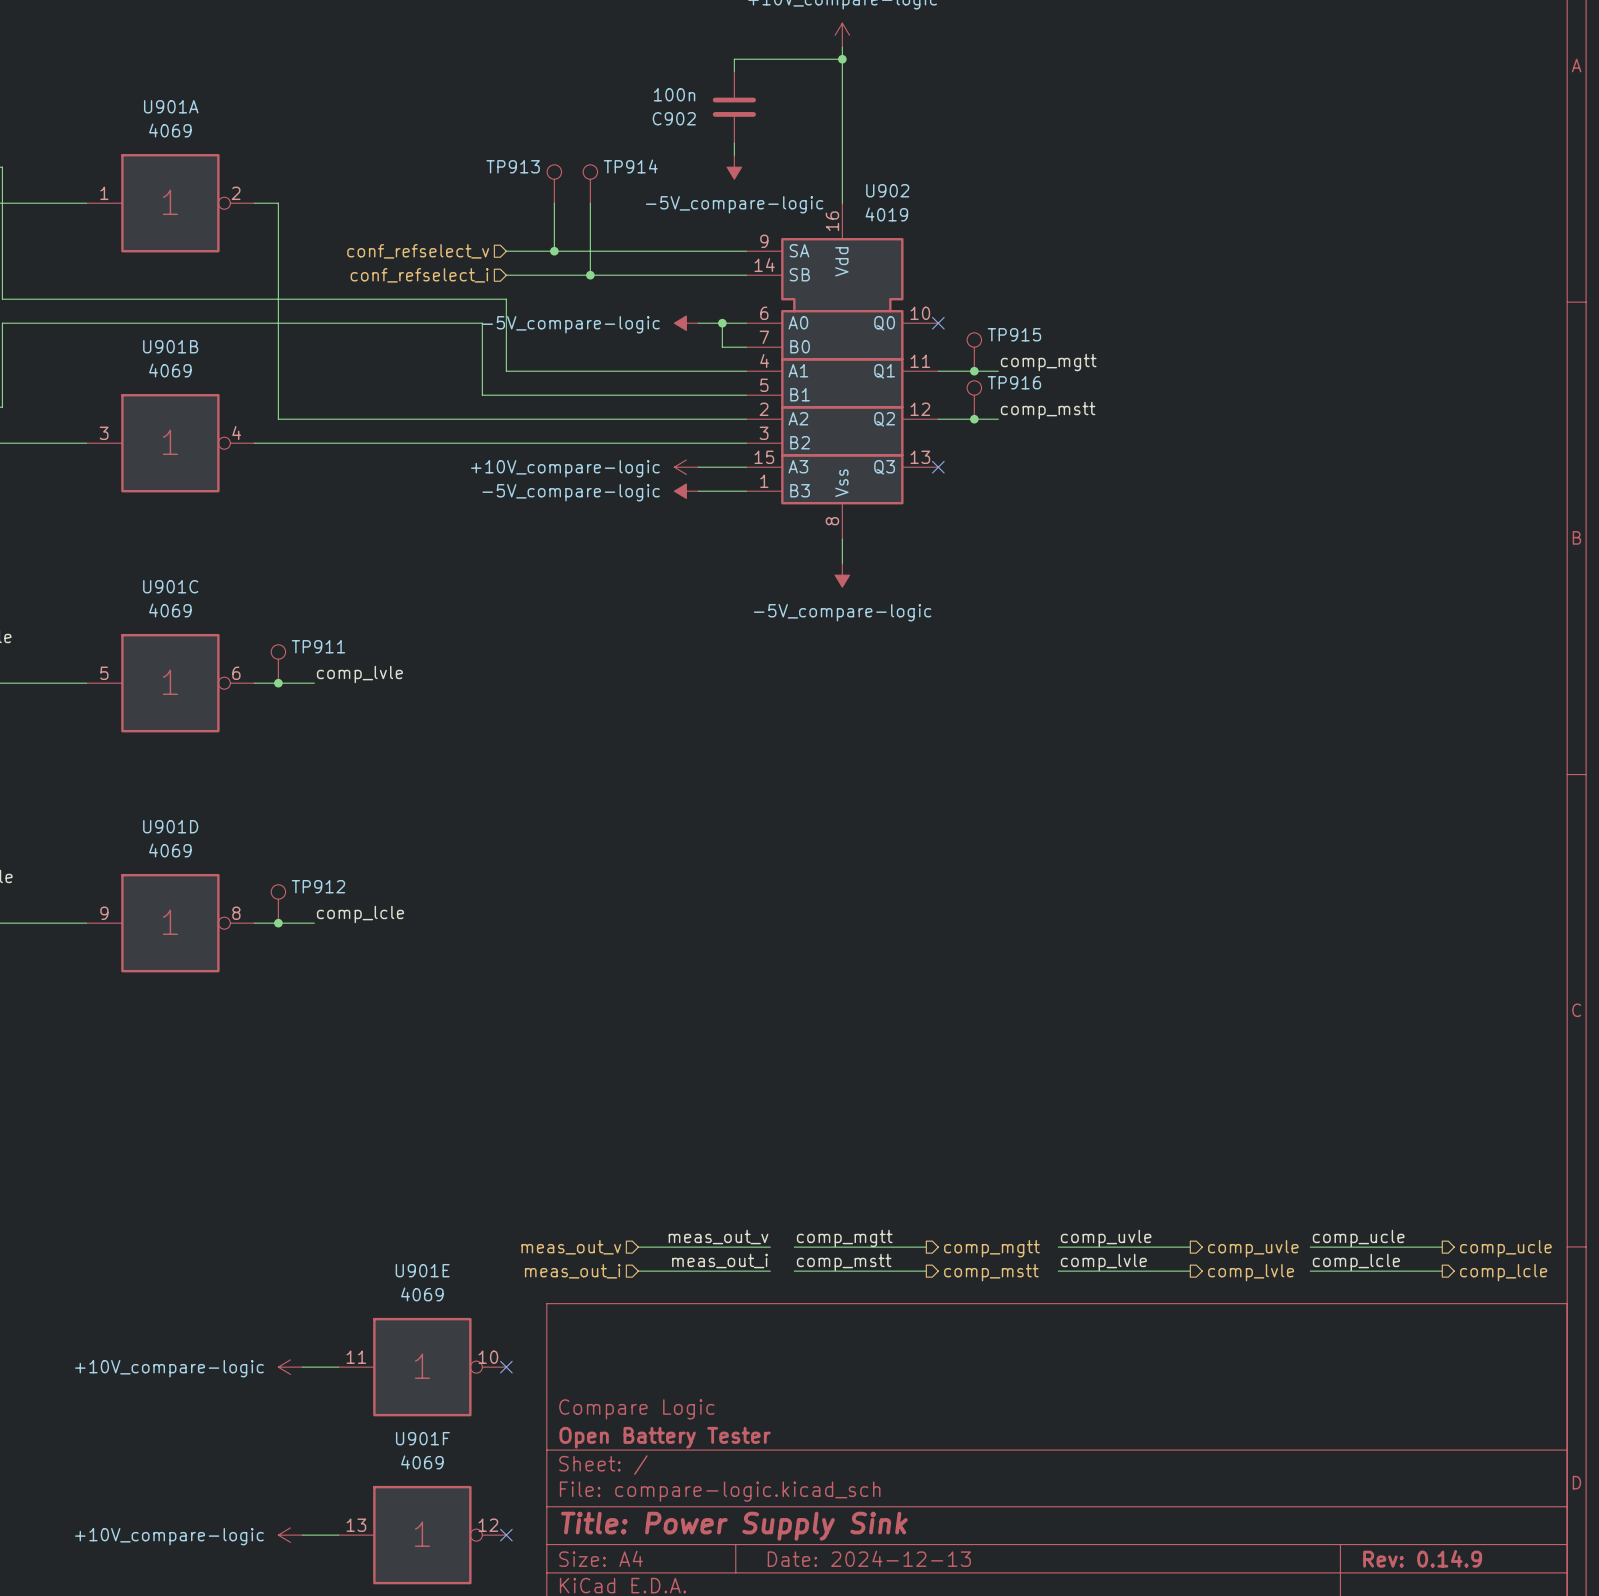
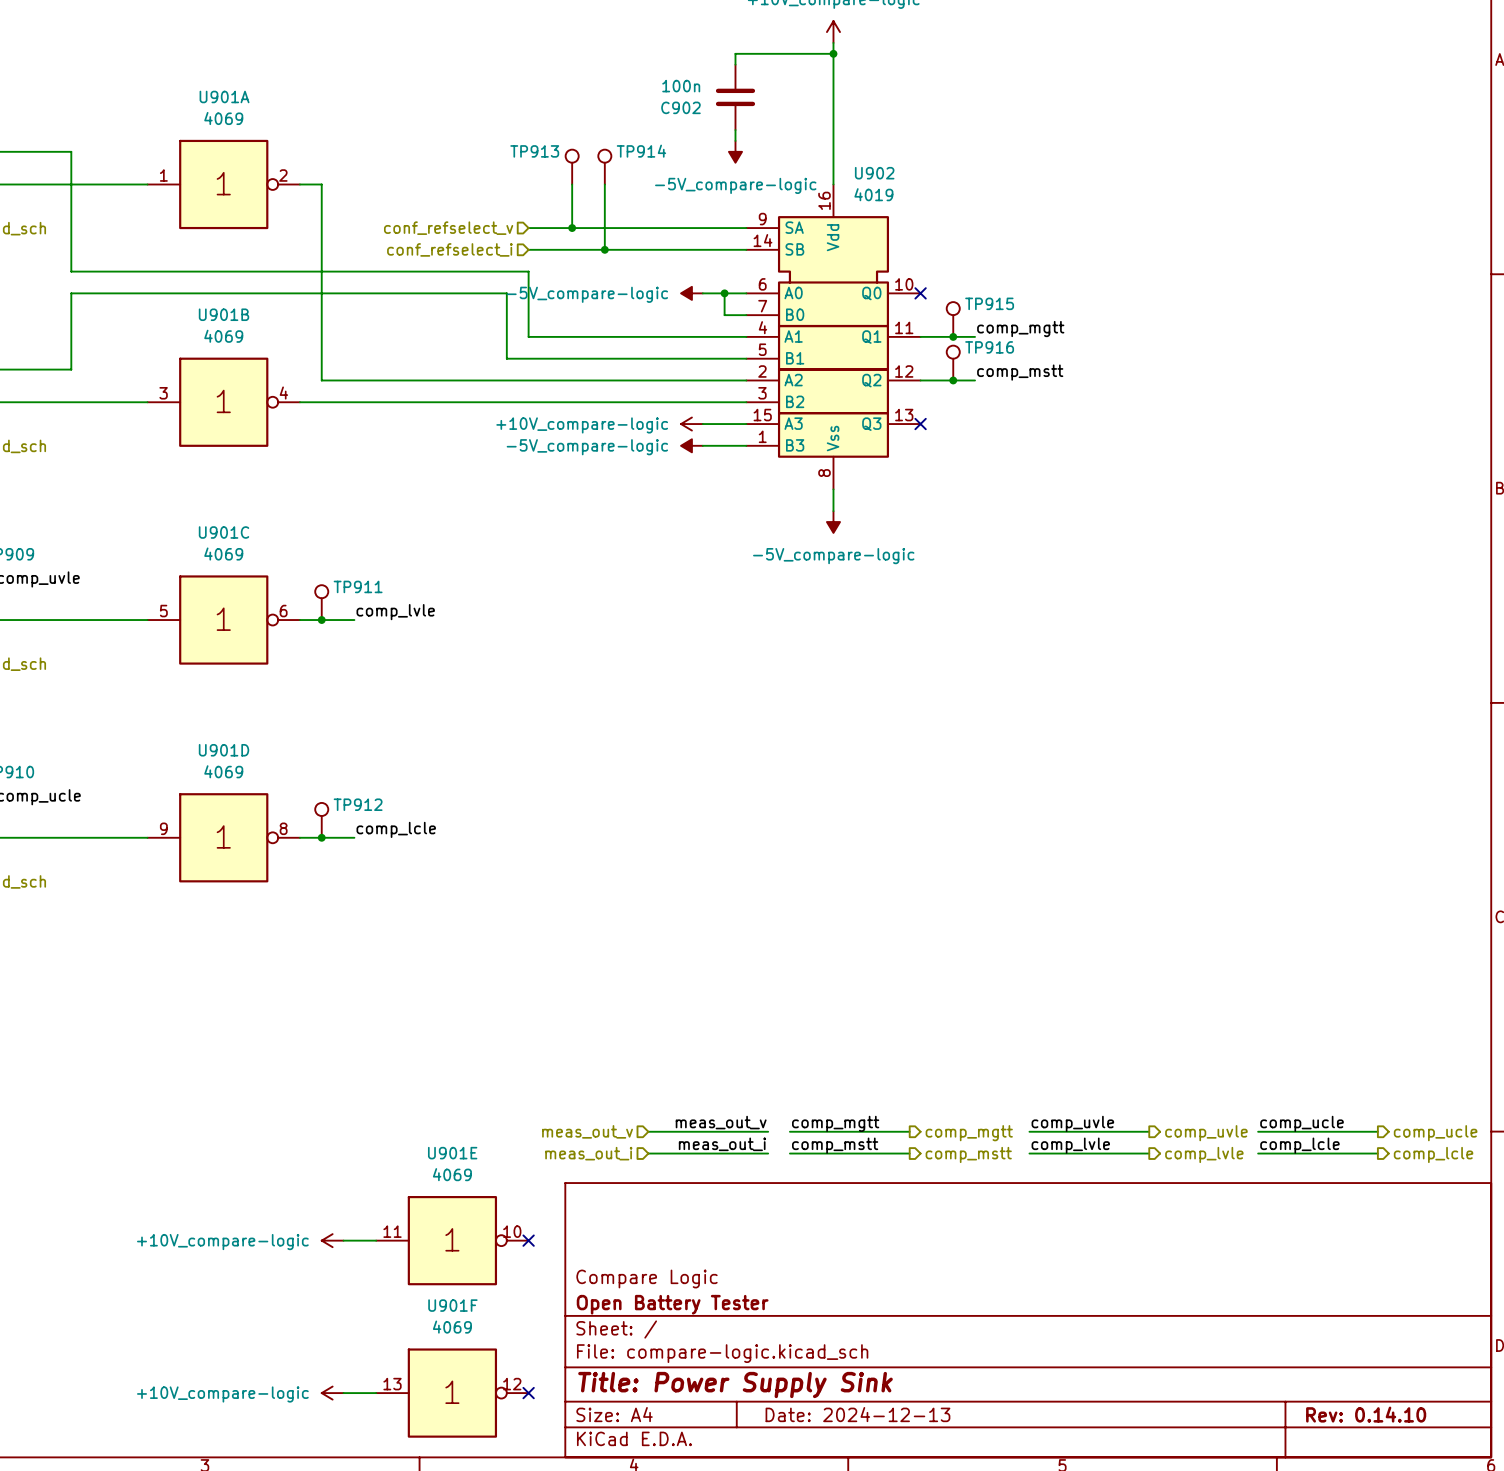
title block: Rev: 0.14.9 (1422, 1558) -> Rev: 0.14.10 (1366, 1414)

